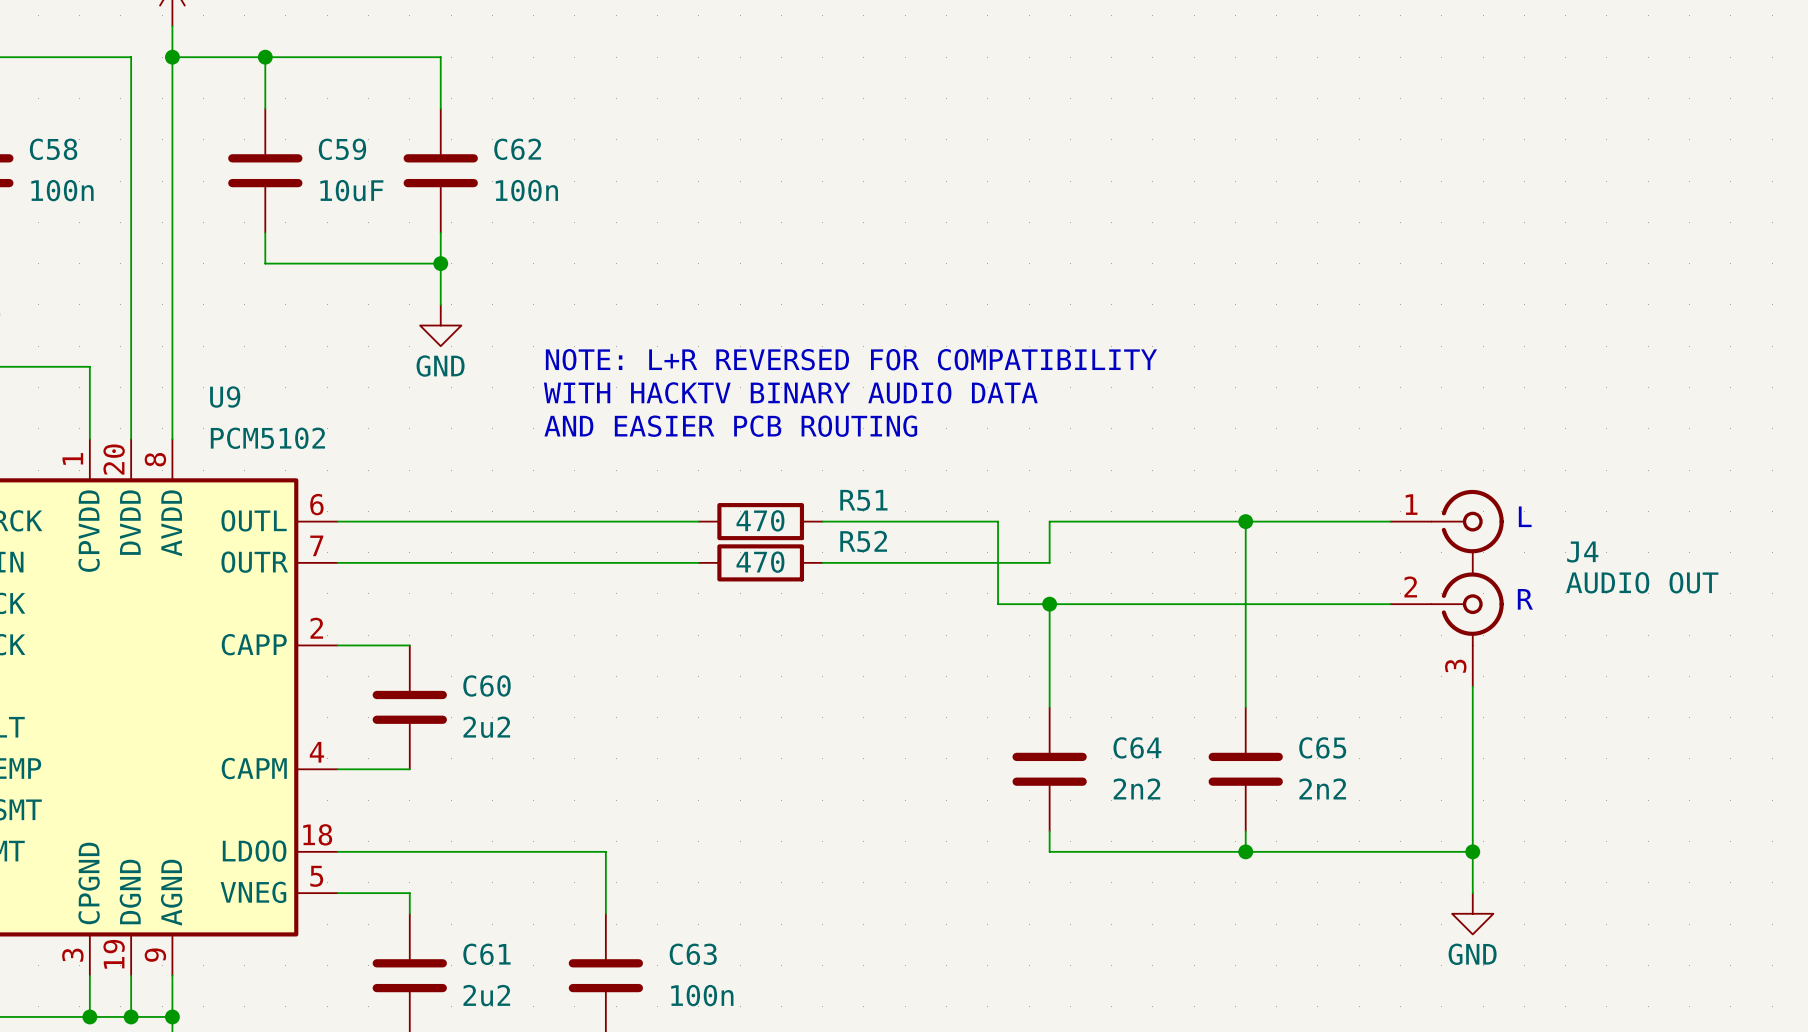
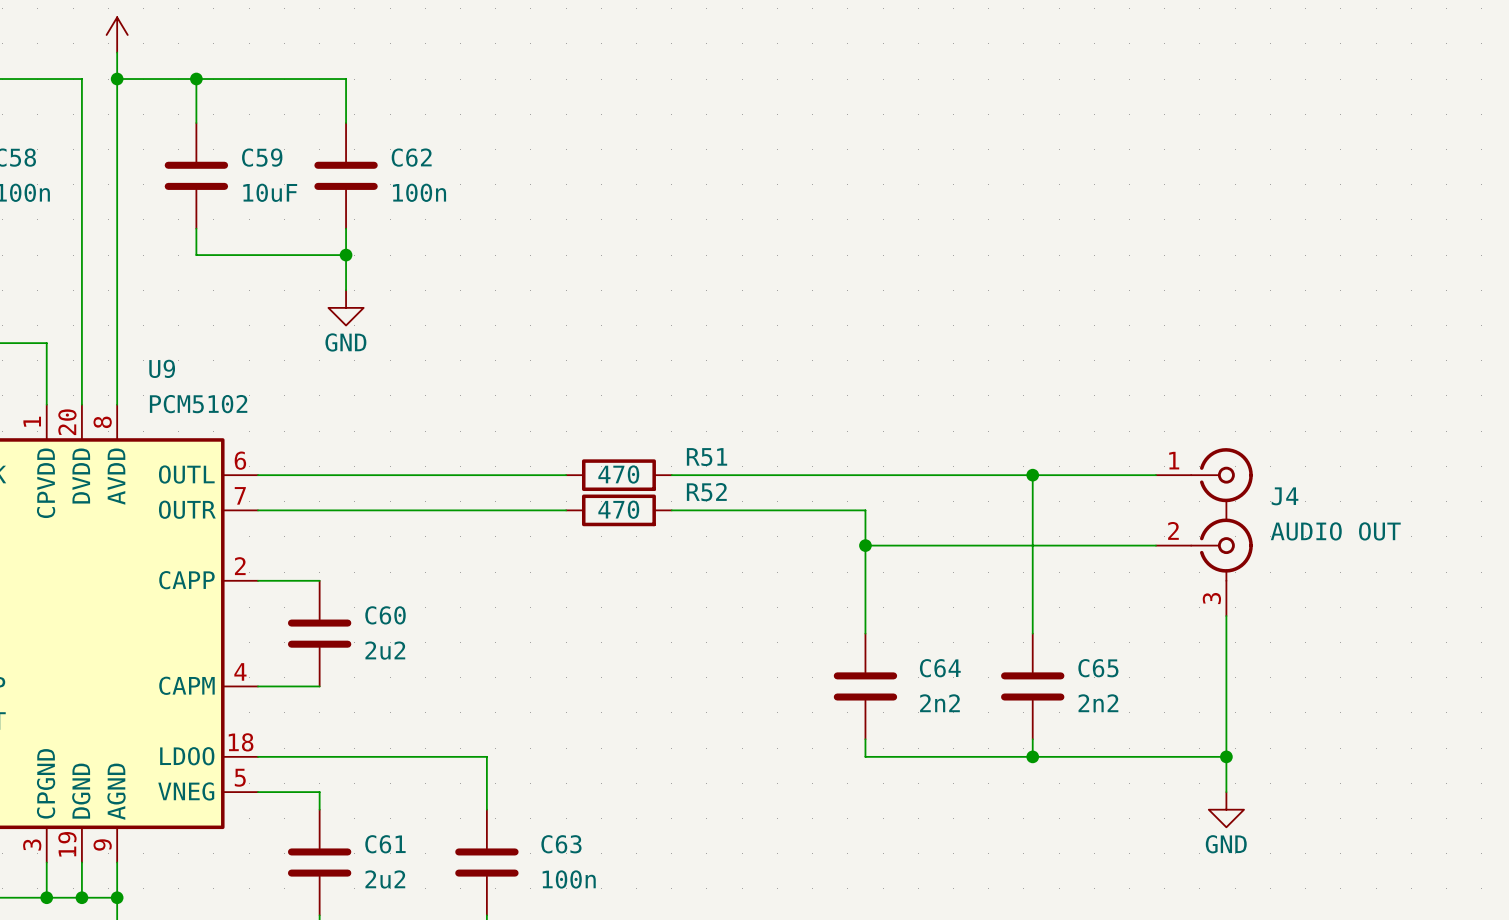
text: NOTE: L+R REVERSED FOR COMPATIBILITY (851, 359) -> none
text: WITH HACKTV BINARY AUDIO DATA (790, 392) -> none
text: AND EASIER PCB ROUTING (730, 426) -> none
text: L (1525, 516) -> none
wire: (998, 521) (998, 604) (1049, 604) -> (865, 510) (865, 545)
wire: (1049, 521) (1049, 562) -> (865, 475) (821, 475)
J4 name position: J4 (1582, 552) -> J4 (1285, 496)
J4 value position: AUDIO OUT (1642, 582) -> AUDIO OUT (1335, 531)
text: R (1525, 599) -> none

